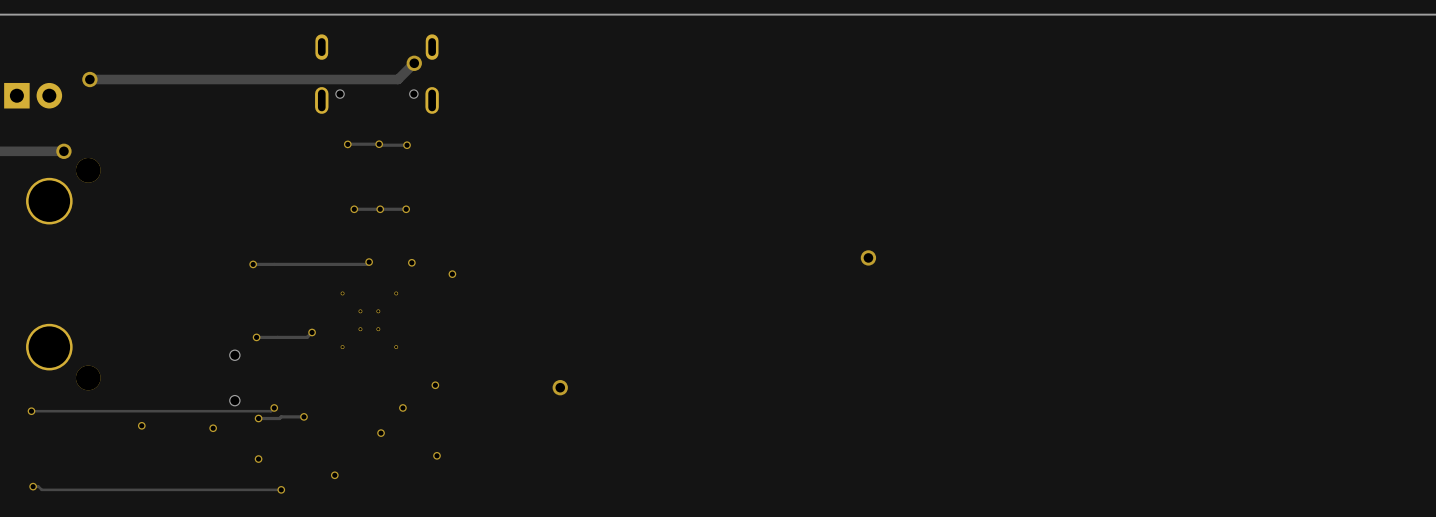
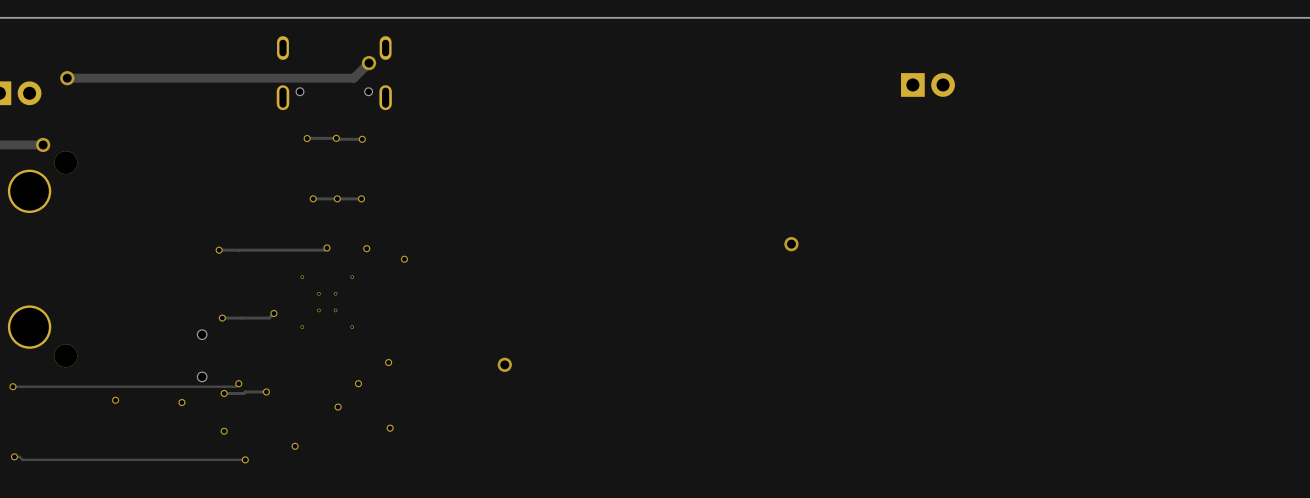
part: none -> (927, 84)

